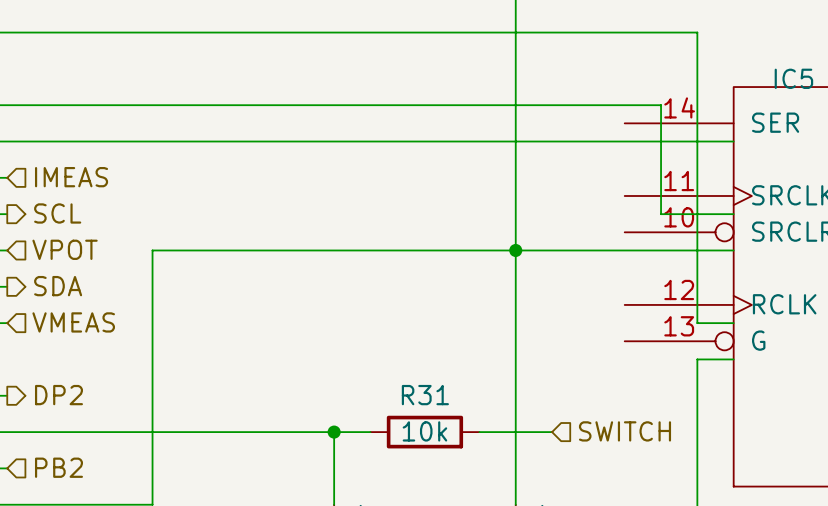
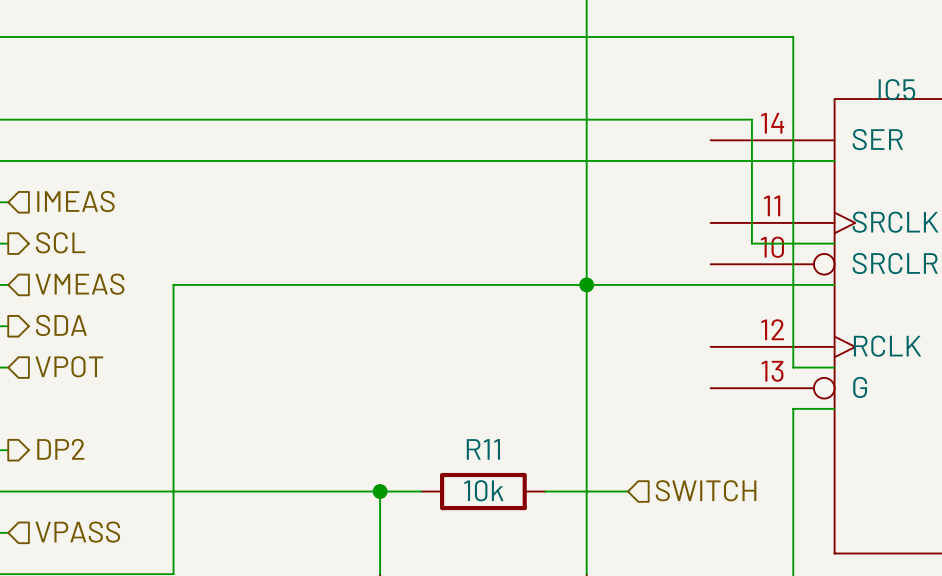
hierarchical label: VPOT (65, 249) -> VMEAS (79, 284)
hierarchical label: VMEAS (73, 322) -> VPOT (69, 366)
R31 name: R31 (425, 395) -> R11 (483, 449)
hierarchical label: PB2 (58, 467) -> VPASS (77, 532)

